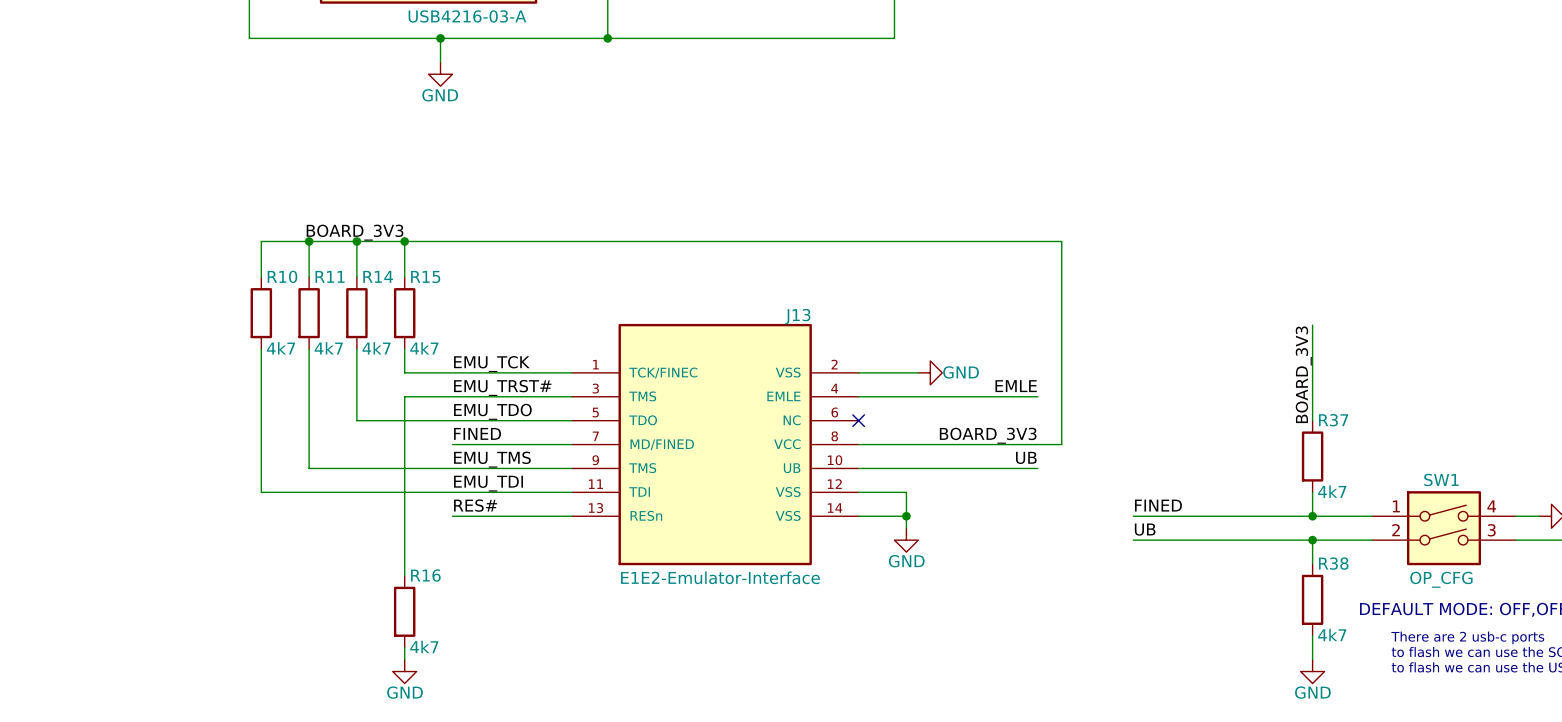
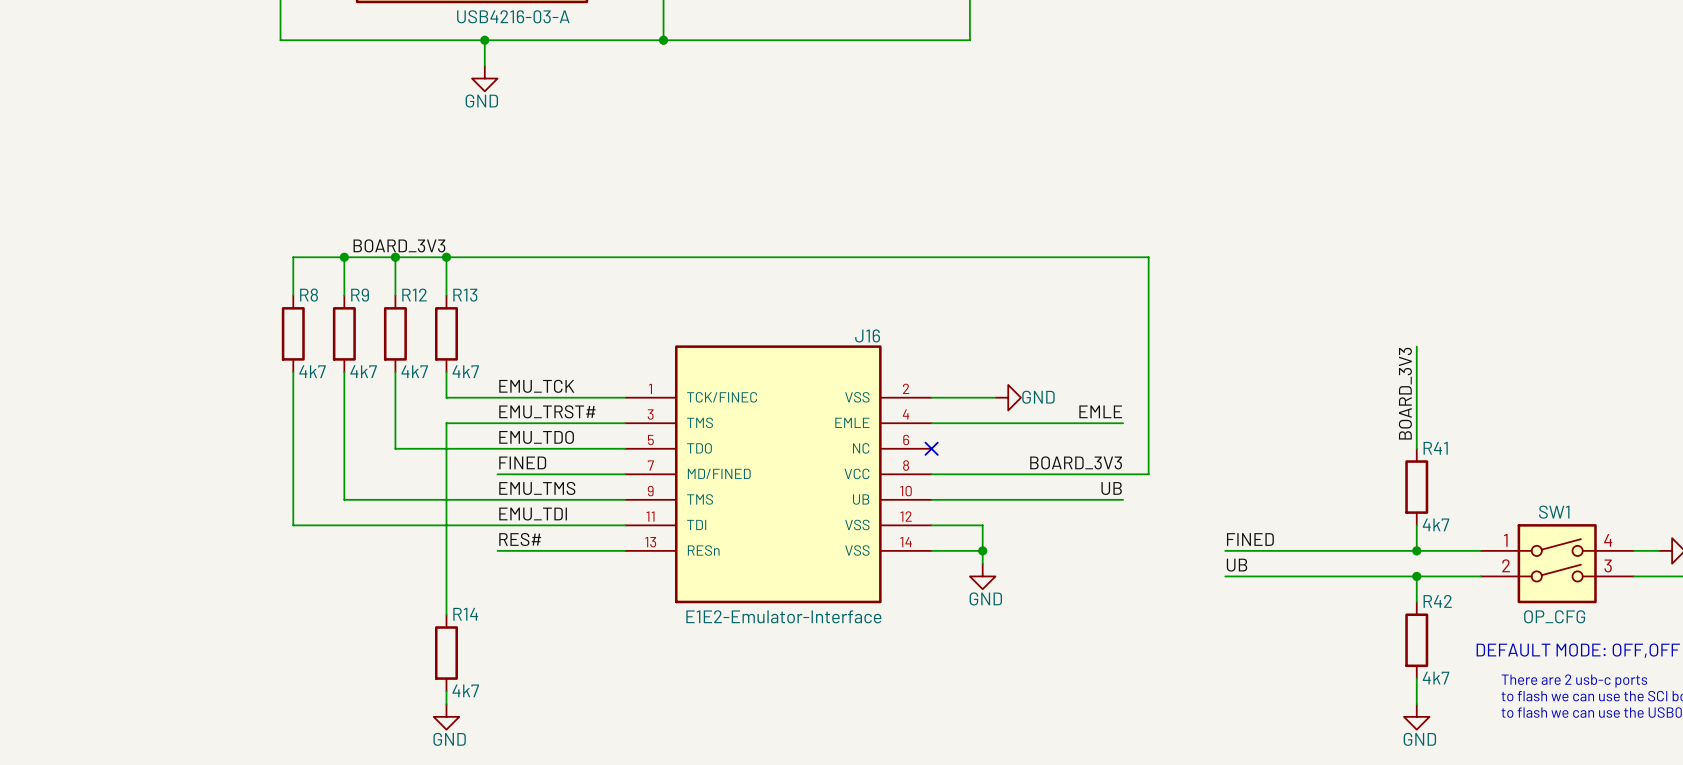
R10 name: R10 (282, 276) -> R8 (309, 295)
R11 name: R11 (330, 276) -> R9 (360, 295)
R14 name: R14 (378, 276) -> R12 (414, 295)
R15 name: R15 (425, 276) -> R13 (465, 295)
J13 name: J13 (797, 316) -> J16 (867, 335)
R37 name: R37 (1333, 420) -> R41 (1435, 448)
R38 name: R38 (1333, 563) -> R42 (1437, 601)
R16 name: R16 (425, 575) -> R14 (465, 614)

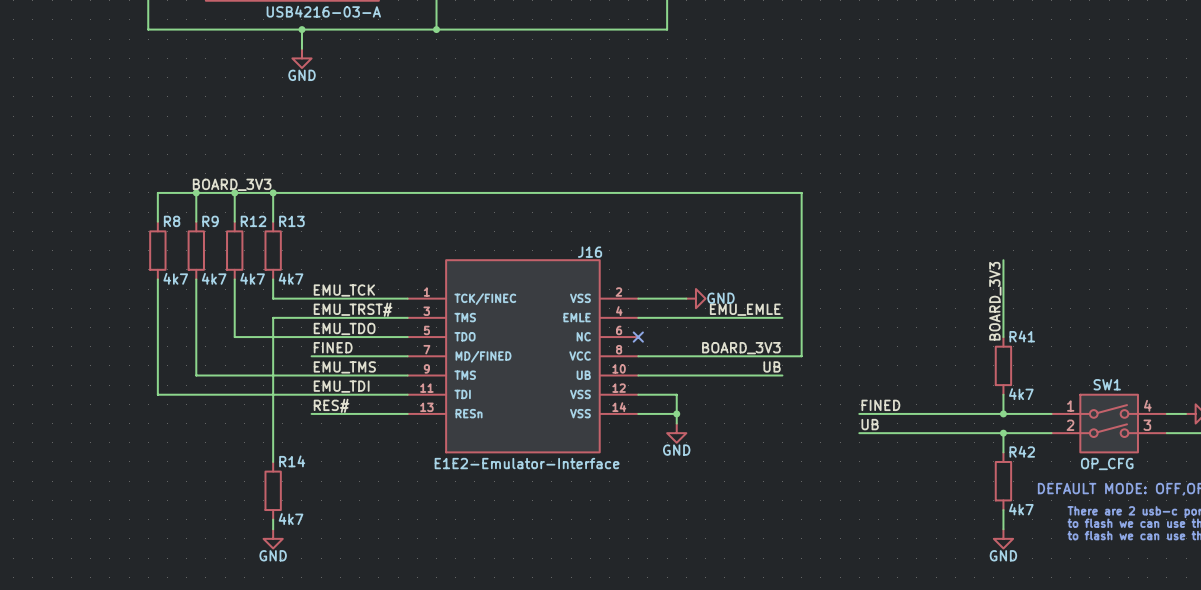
label: EMLE (1100, 411) -> EMU_EMLE (745, 309)

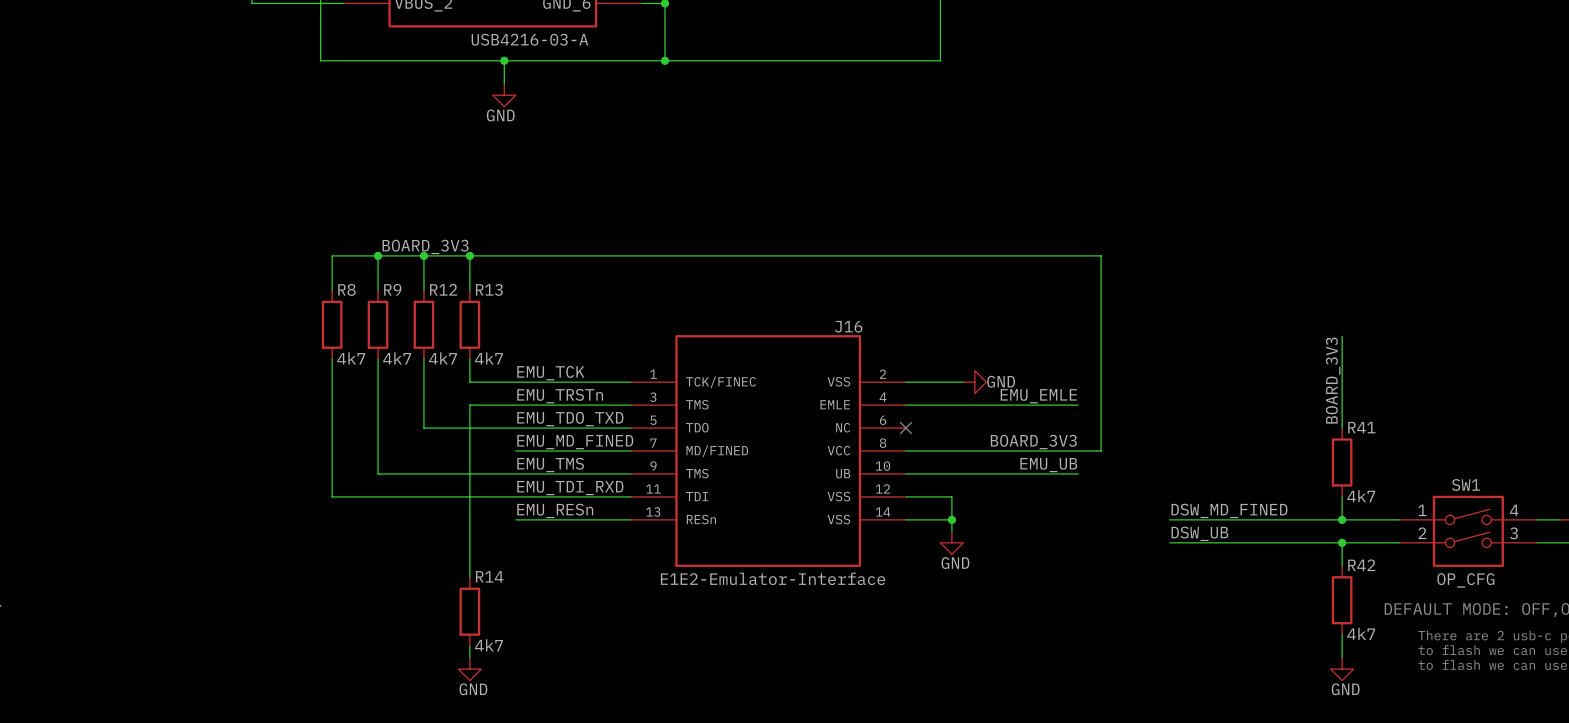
label: EMU_TRST# (353, 309) -> EMU_TRSTn (560, 396)
label: EMU_TDO (344, 328) -> EMU_TDO_TXD (570, 419)
label: FINED (333, 347) -> EMU_MD_FINED (575, 442)
label: UB (772, 366) -> EMU_UB (1048, 465)
label: EMU_TDI (341, 386) -> EMU_TDI_RXD (570, 488)
label: RES# (331, 405) -> EMU_RESn (555, 510)
label: FINED (880, 405) -> DSW_MD_FINED (1229, 510)
label: UB (870, 424) -> DSW_UB (1199, 533)

